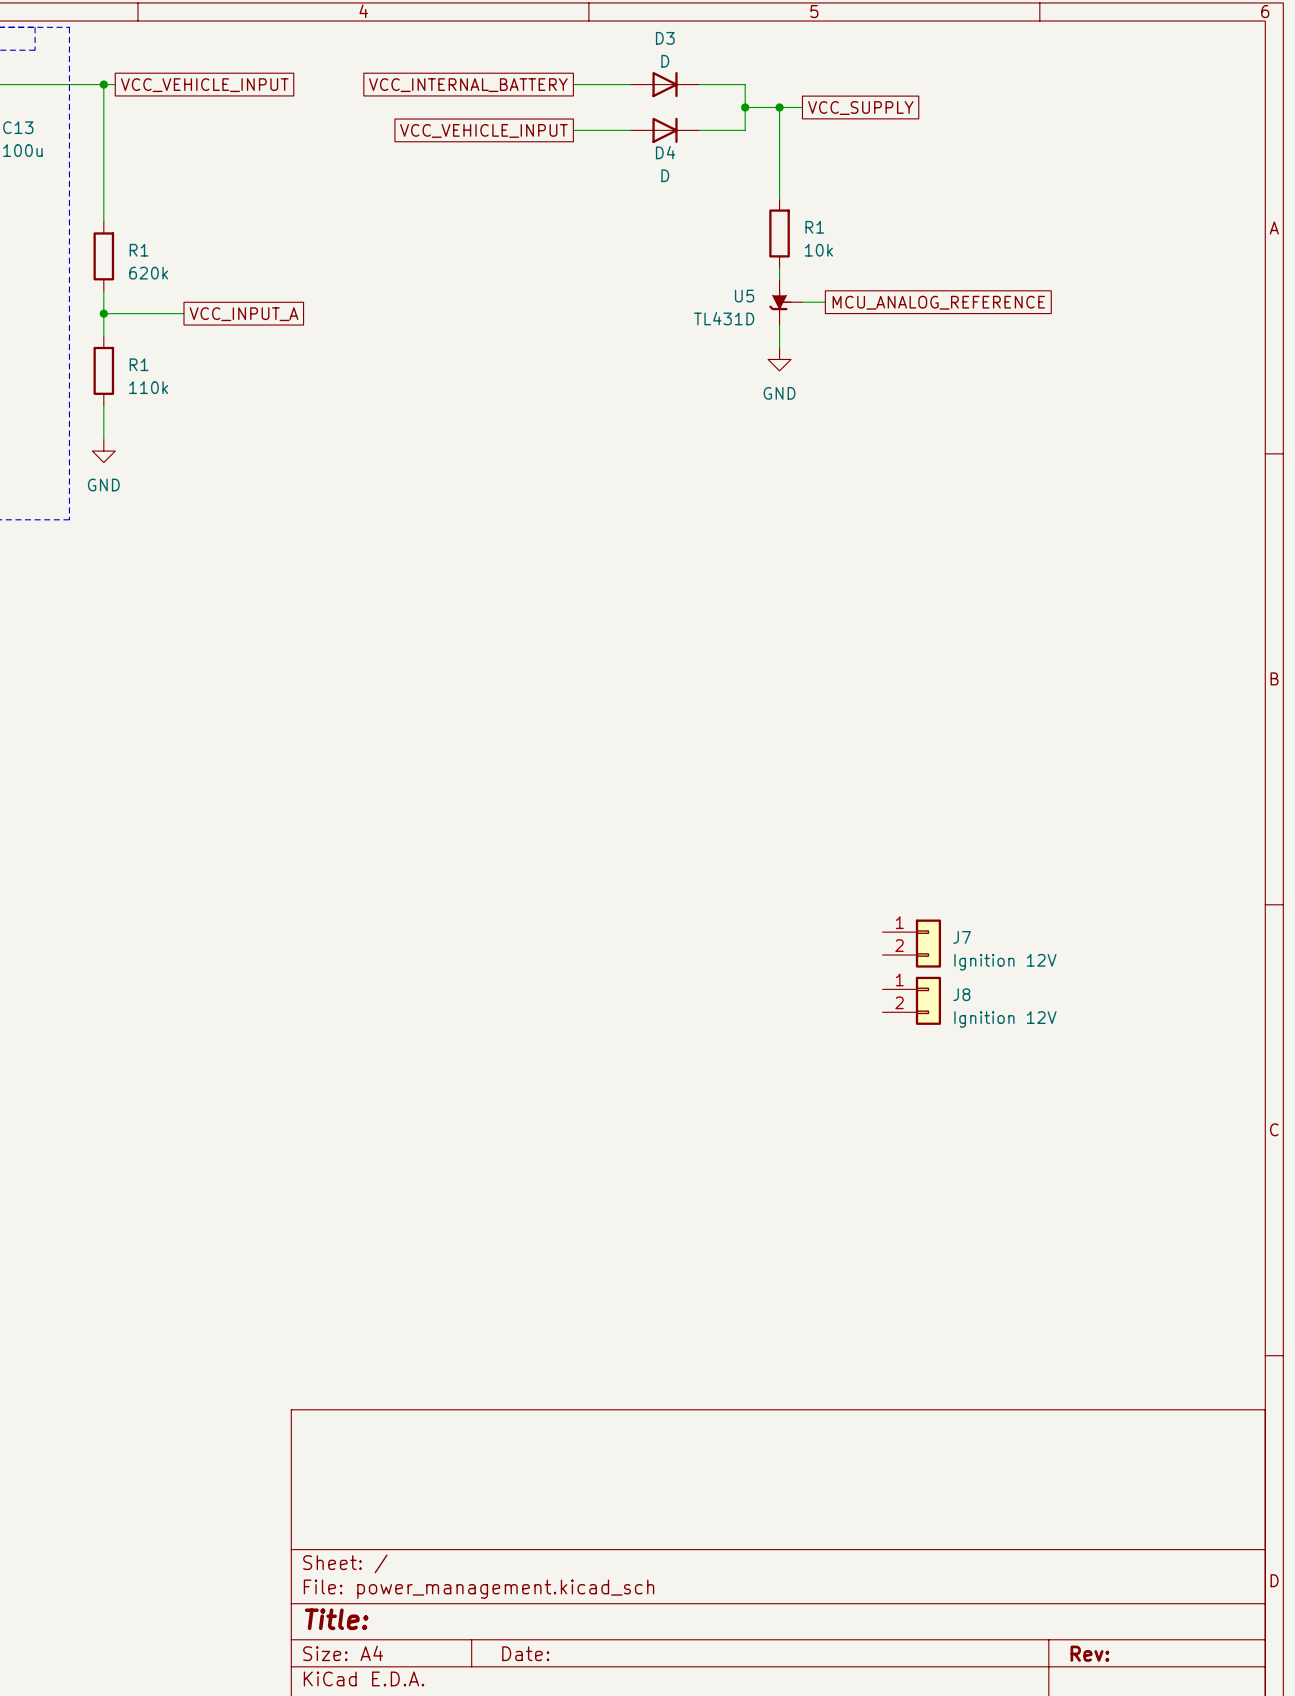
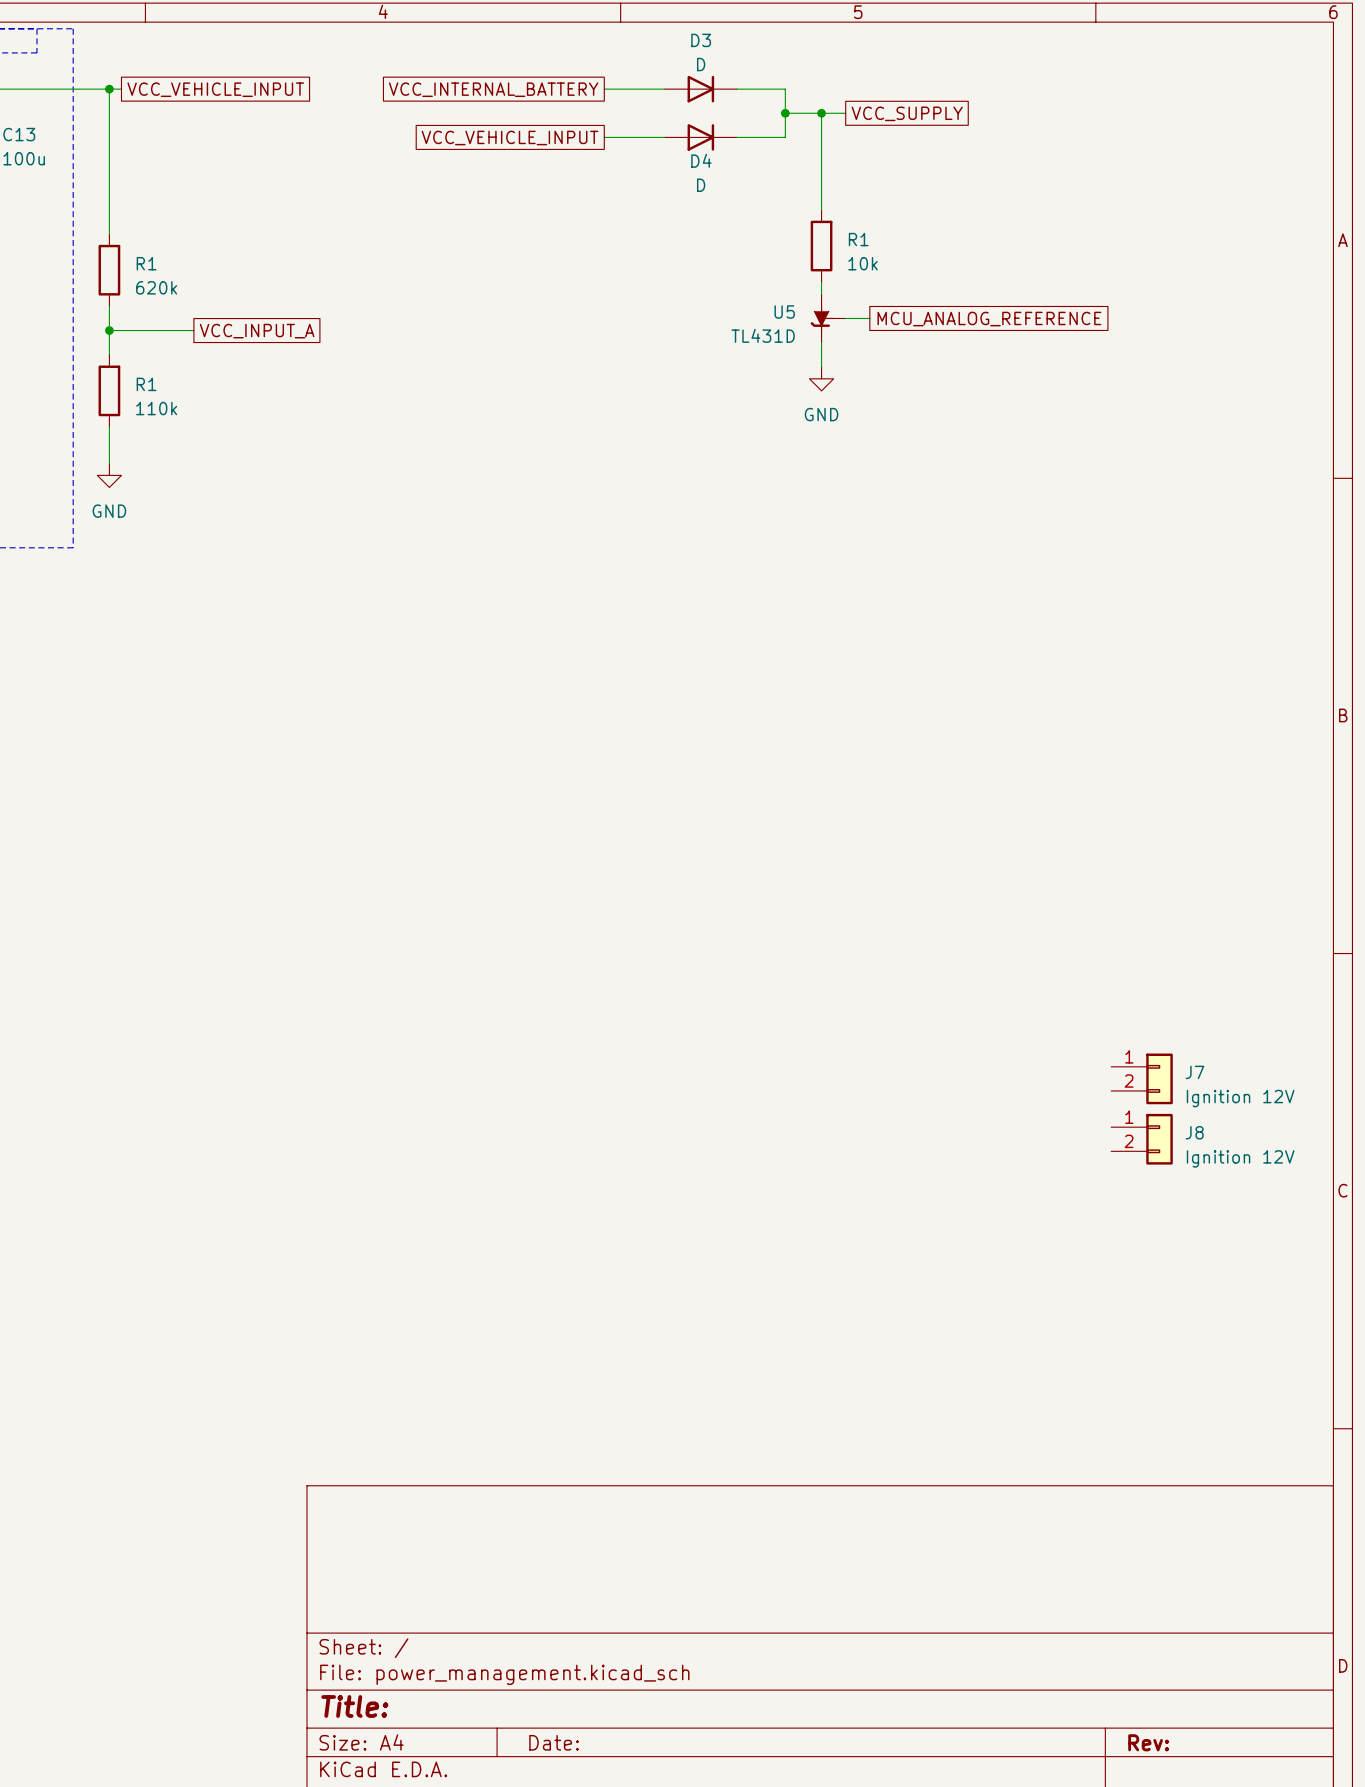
J7 position: (911, 943) -> (1142, 1078)
J8 position: (911, 1000) -> (1142, 1139)

